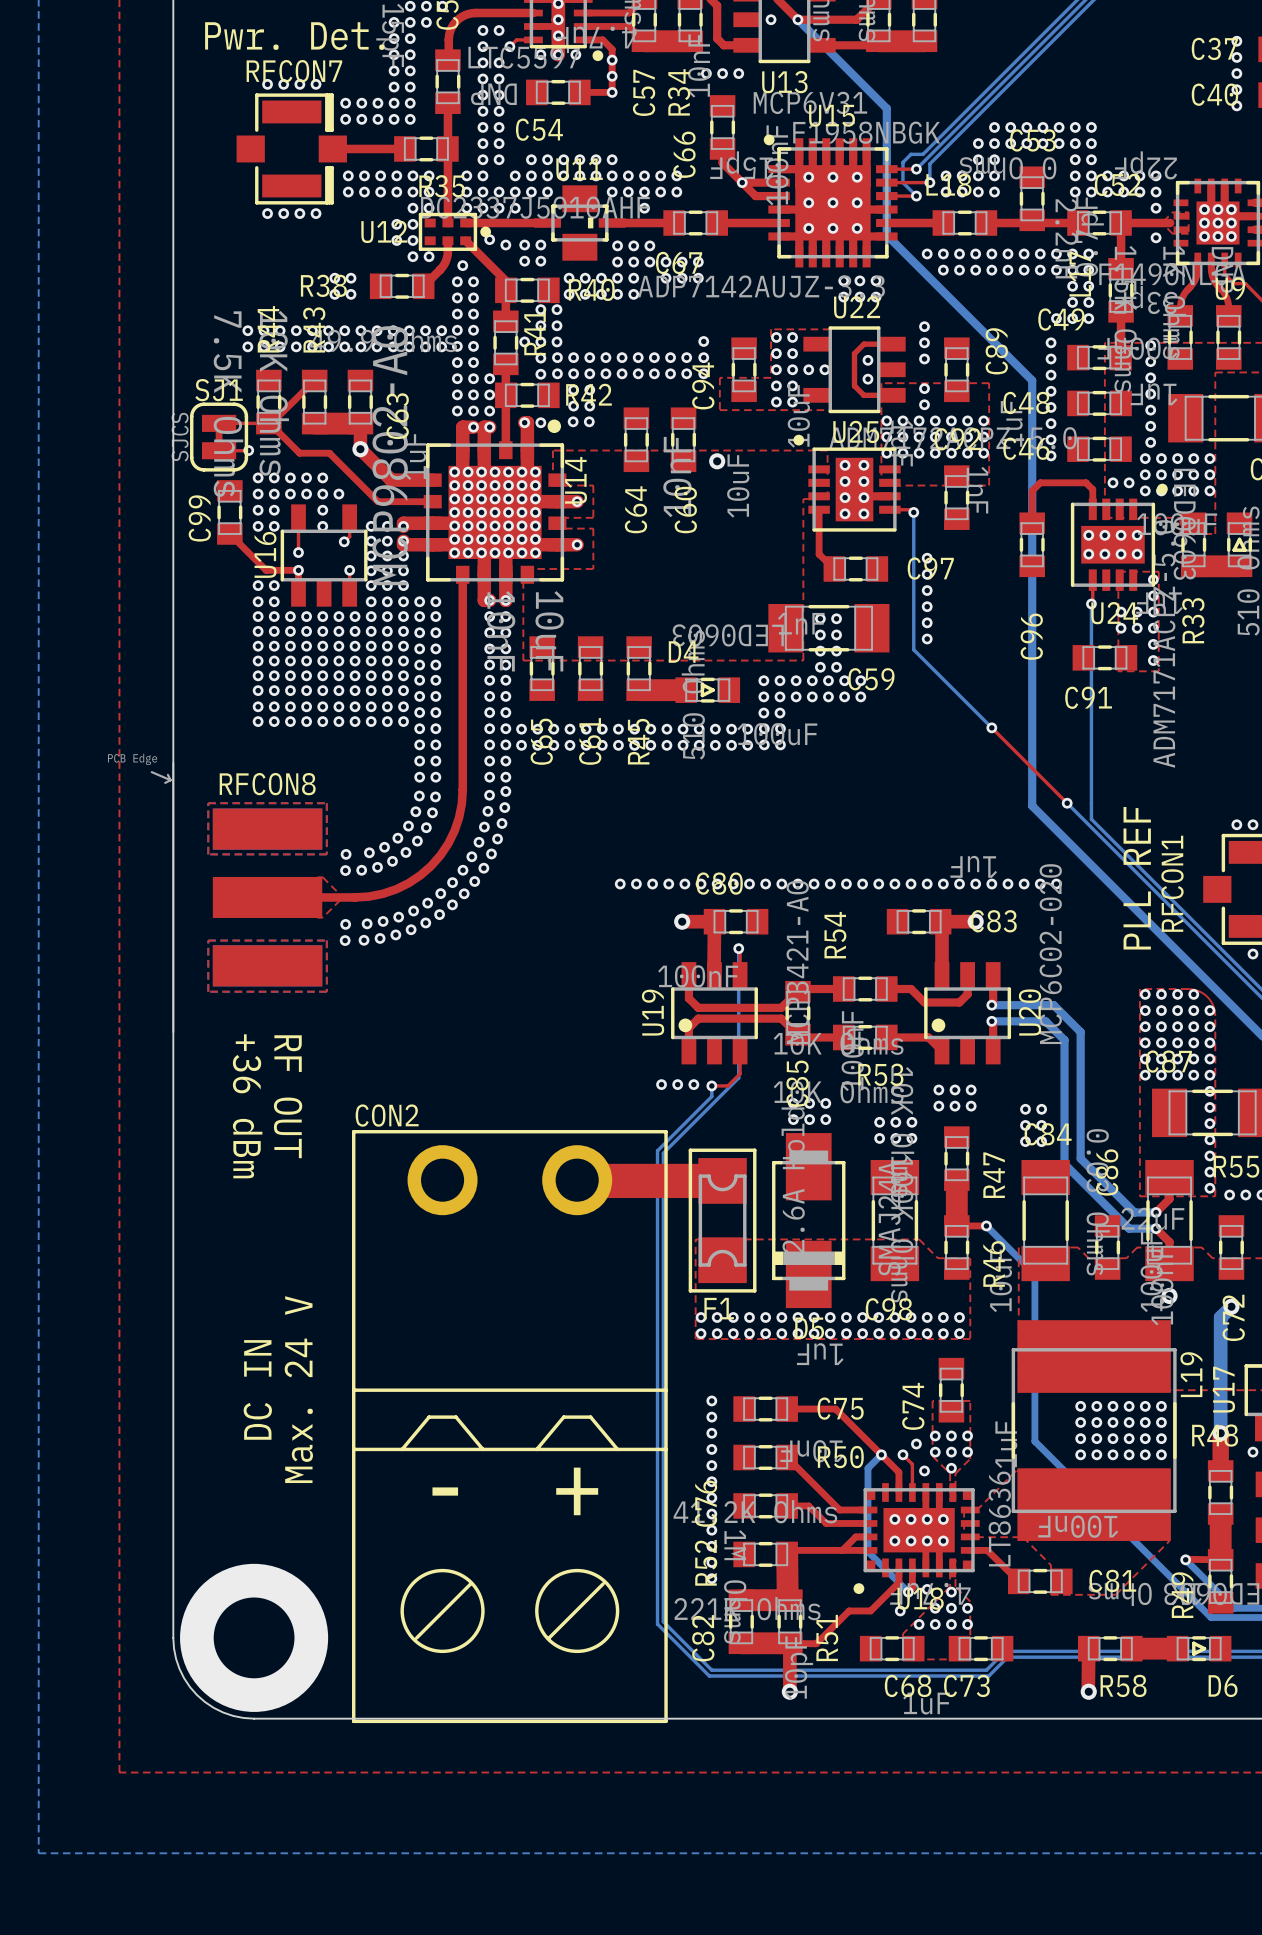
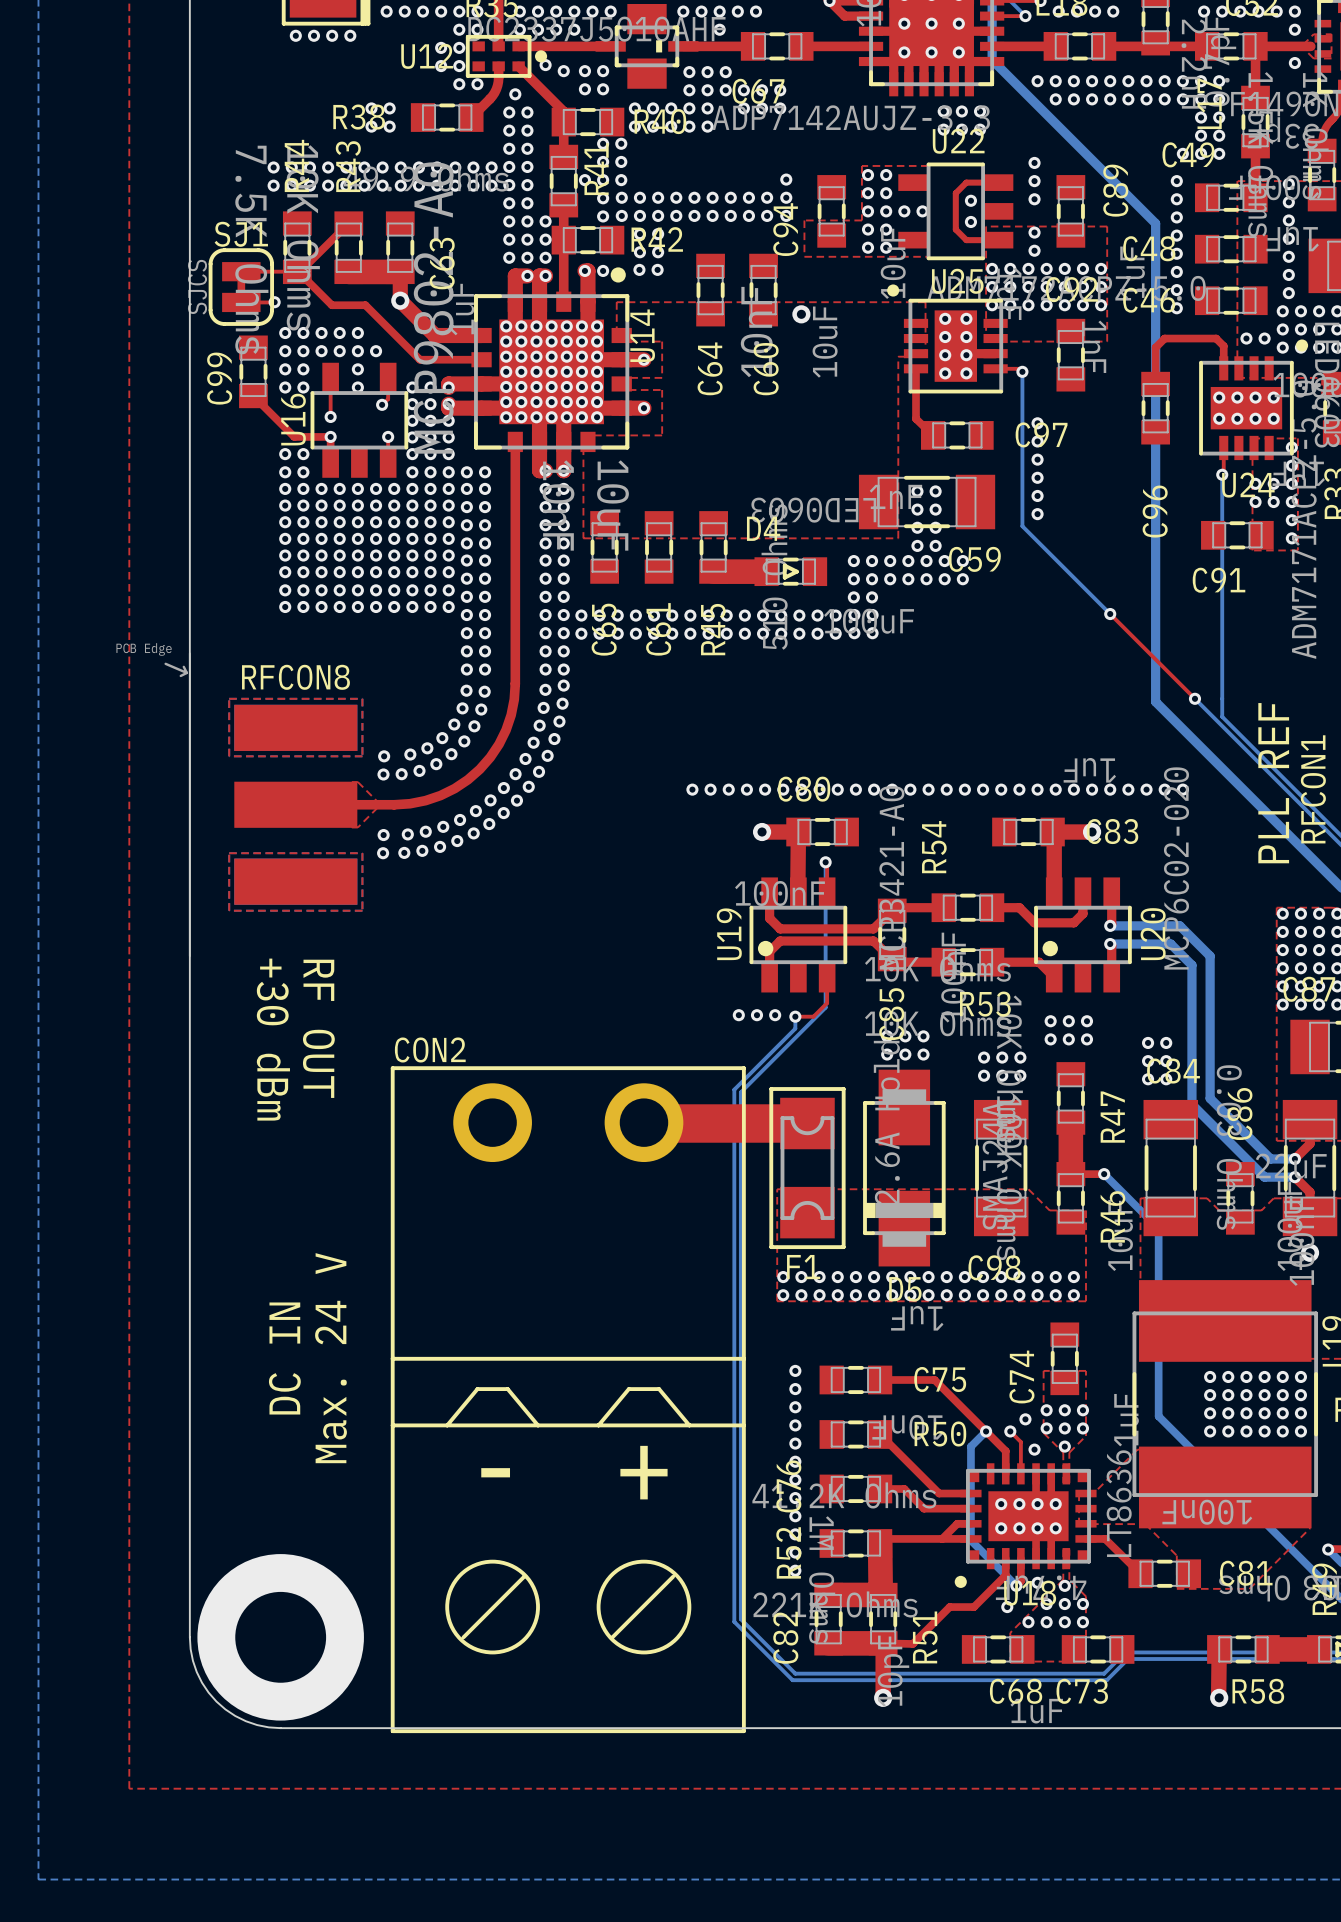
text: +36 dBm (247, 1106) -> +30 dBm (273, 1039)

